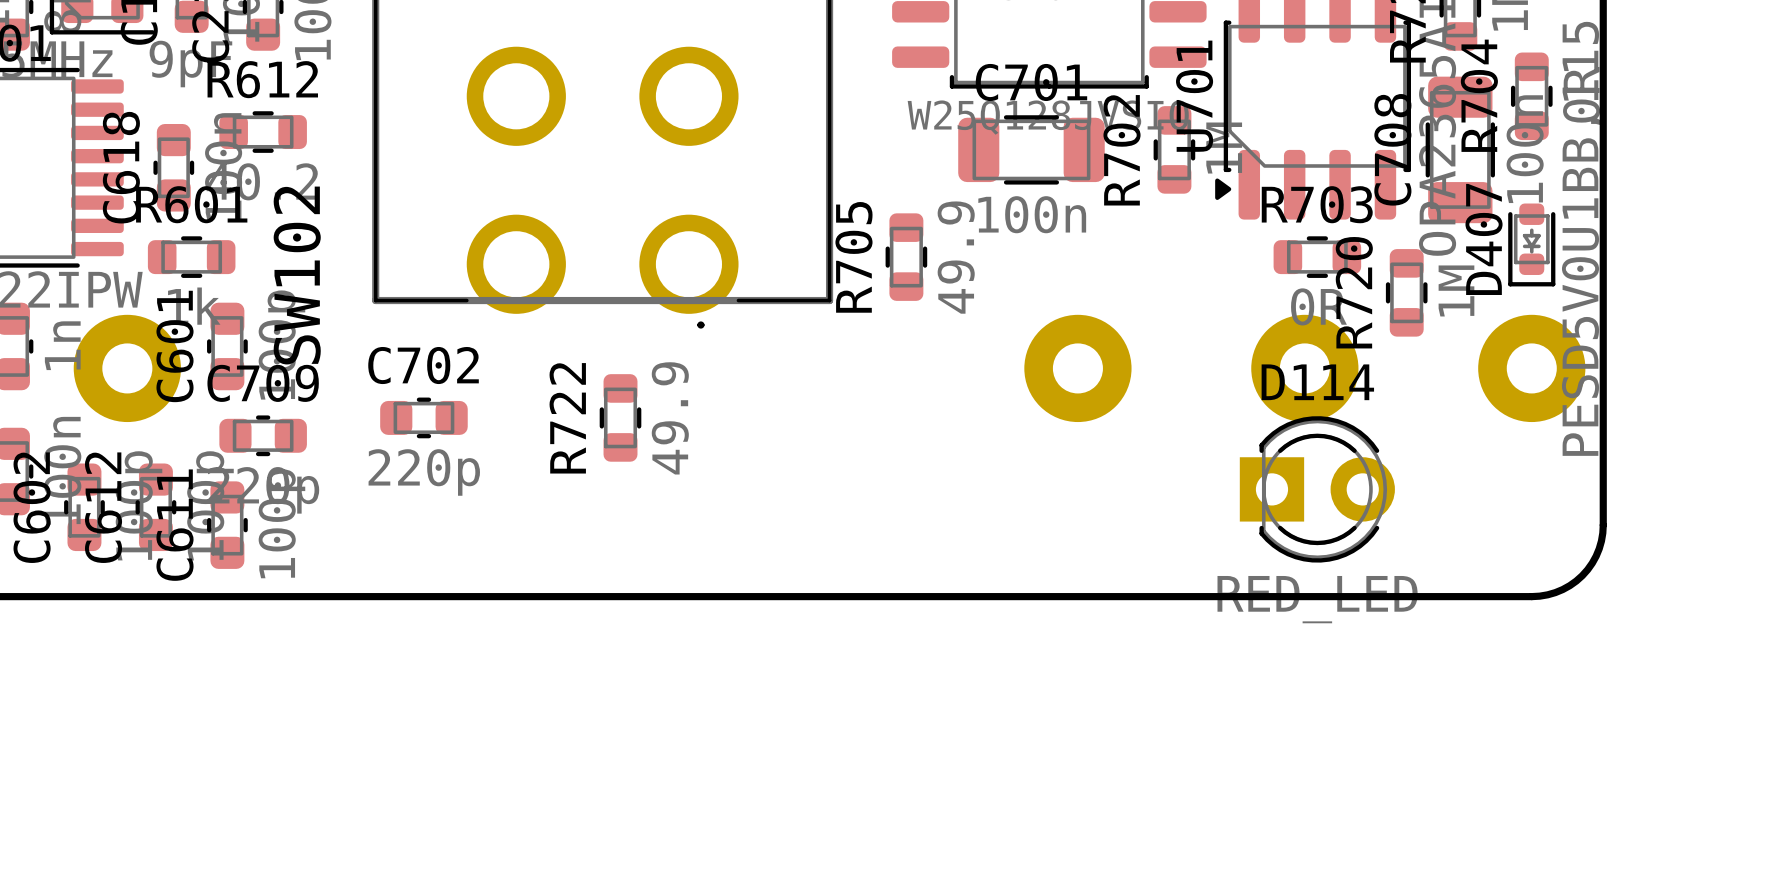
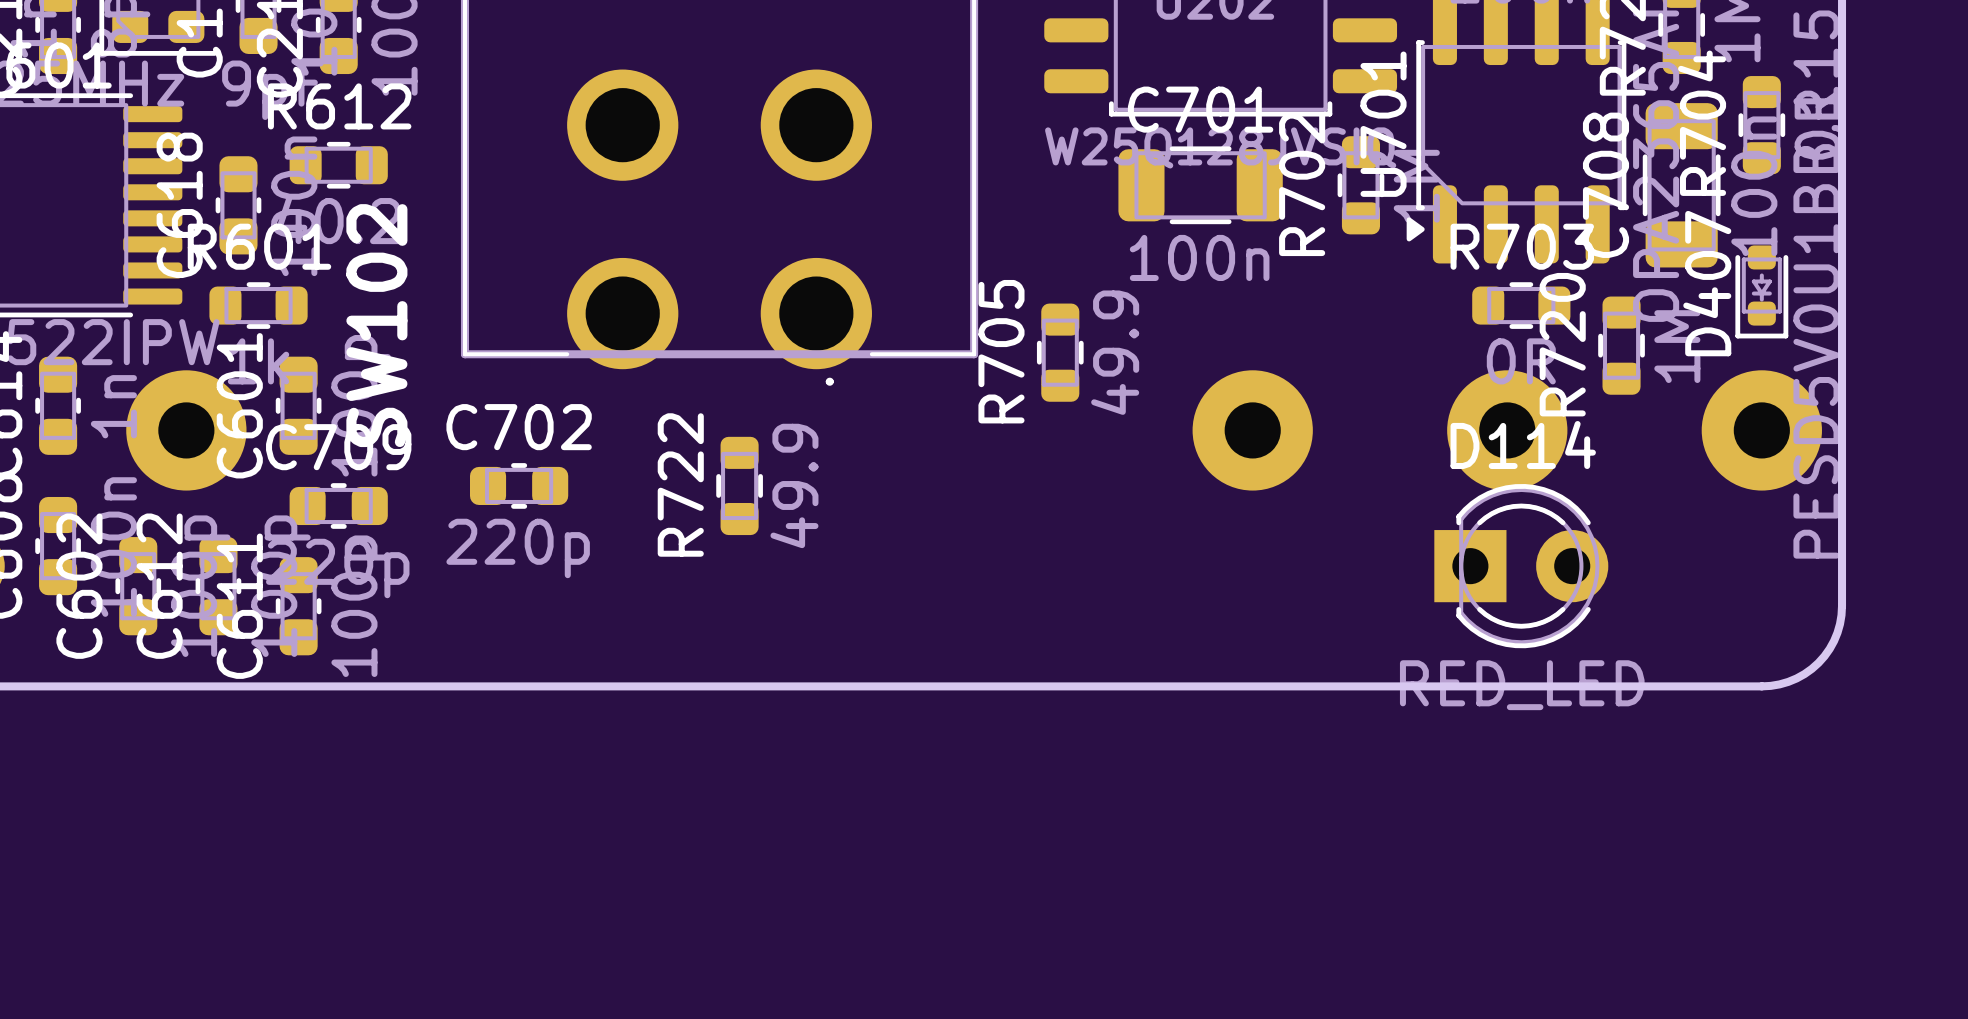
R705 position: (906, 257) -> (1060, 352)

